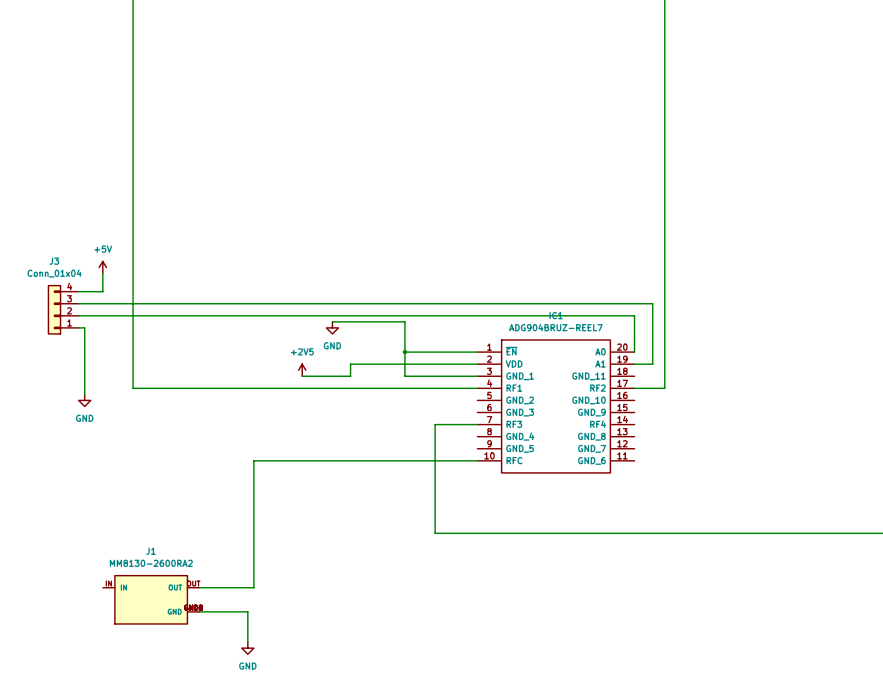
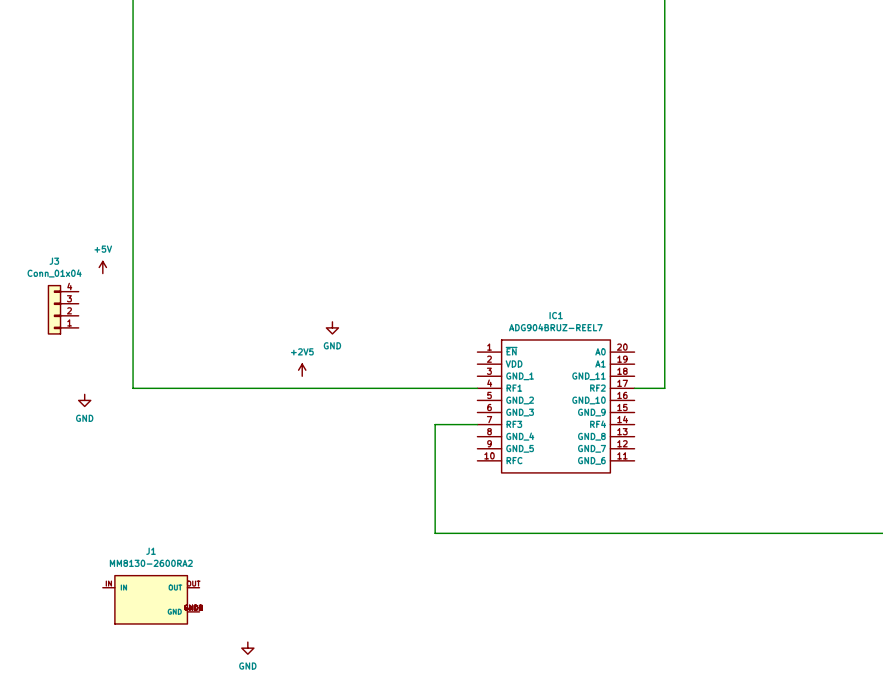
wire: (102, 273) (102, 291) (78, 291) -> none
wire: (78, 303) (652, 303) (652, 364) (634, 364) -> none
wire: (78, 315) (634, 315) (634, 352) -> none
wire: (332, 321) (404, 321) (404, 376) (477, 376) -> none
wire: (78, 327) (84, 327) (84, 394) -> none
wire: (404, 352) (477, 352) -> none
junction: (404, 352) -> none
wire: (477, 364) (350, 364) (350, 376) (302, 376) -> none
wire: (477, 460) (253, 460) (253, 587) (199, 587) -> none
wire: (199, 611) (247, 611) (247, 642) -> none

